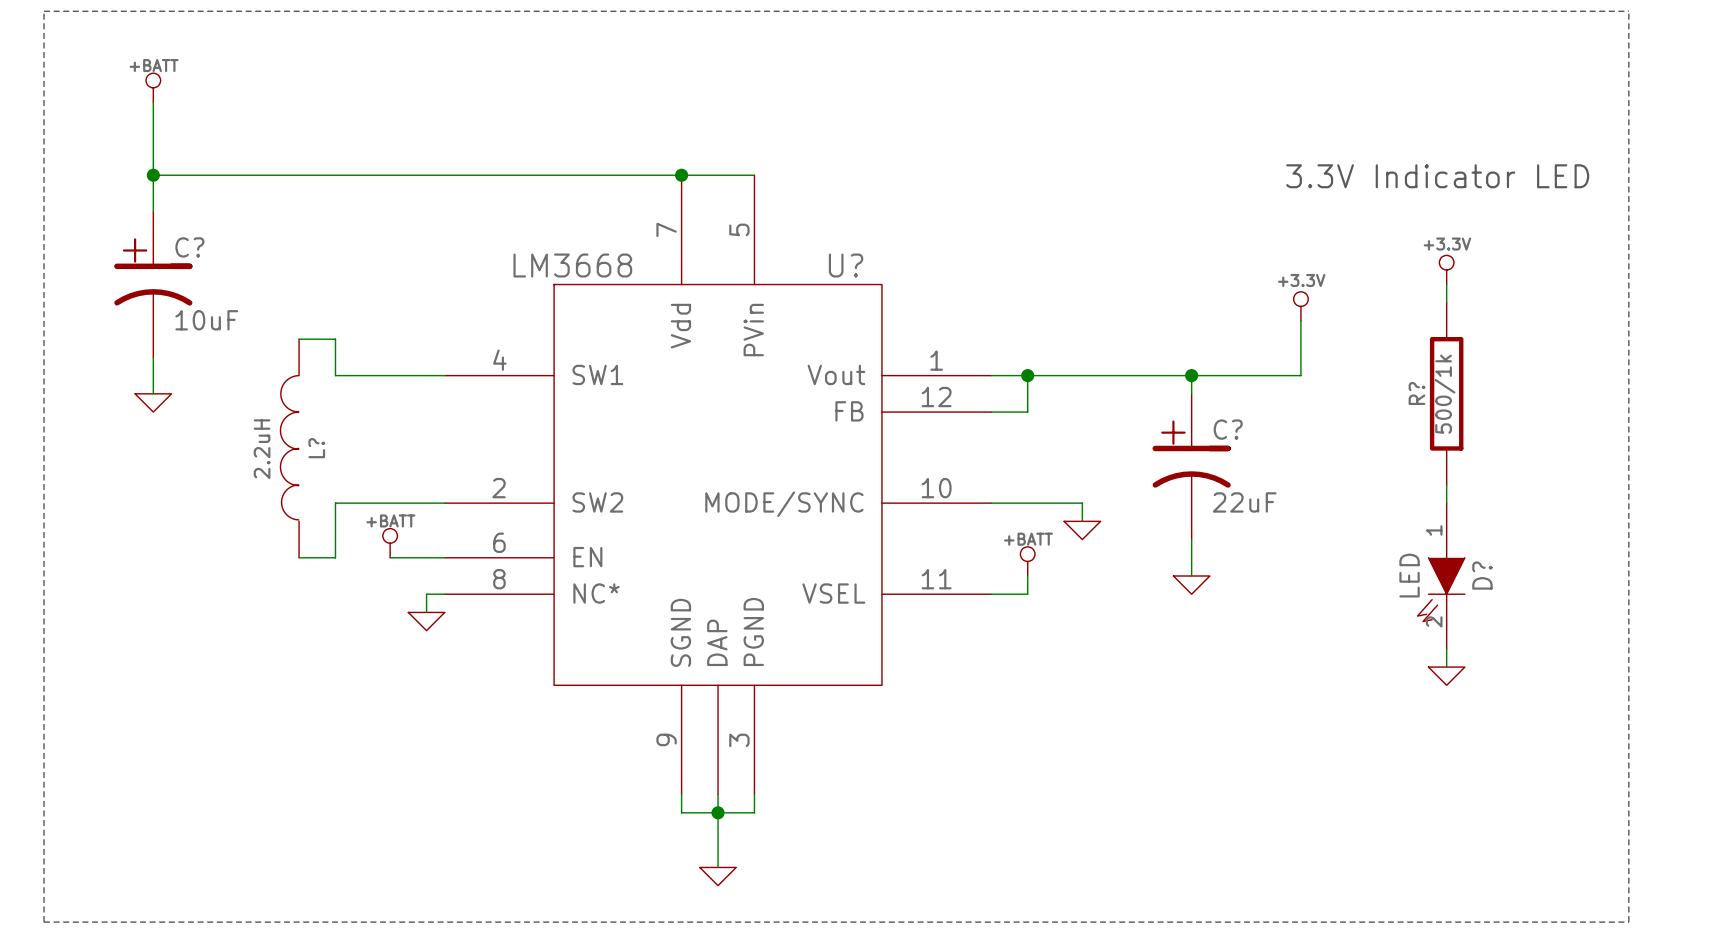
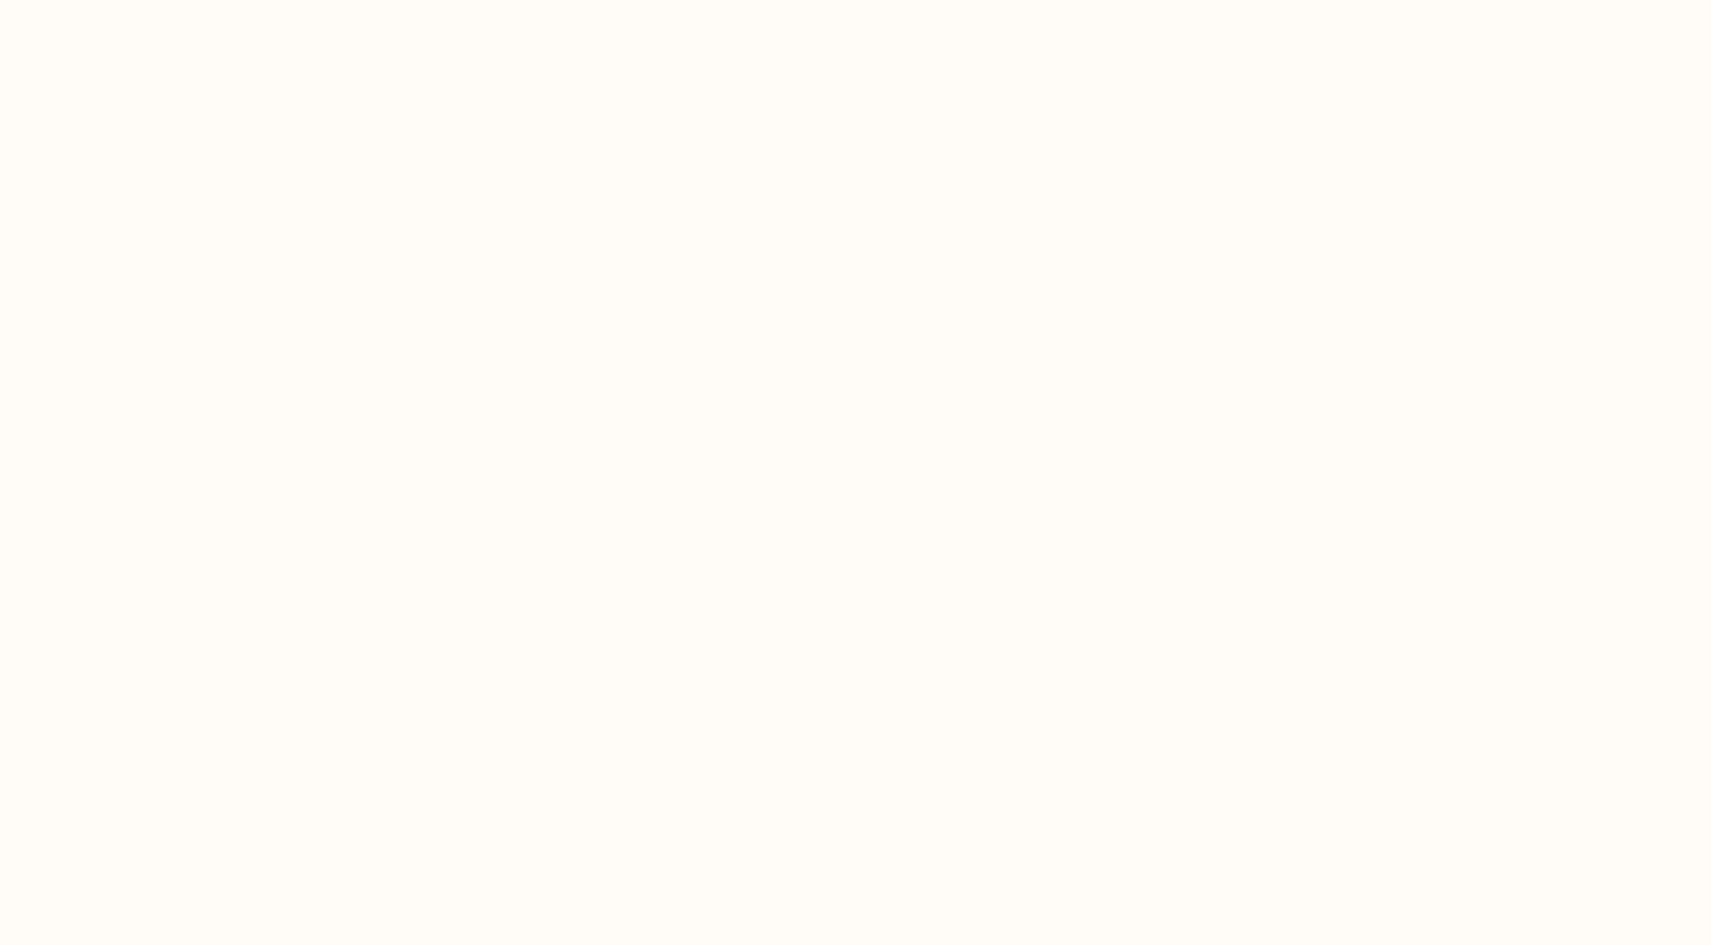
line: (44, 11) (1628, 11) (1628, 922) (44, 922) (44, 11) -> none
power symbol: +BATT (153, 87) -> none
wire: (153, 102) (153, 211) -> none
wire: (153, 175) (754, 175) -> none
junction: (153, 175) -> none
junction: (681, 175) -> none
text: 3.3V Indicator LED (1437, 176) -> none
power symbol: +3.3V (1446, 269) -> none
C?: 10uF (153, 284) -> none
wire: (1446, 284) (1446, 302) -> none
power symbol: +3.3V (1300, 306) -> none
wire: (1300, 320) (1300, 375) (991, 375) -> none
wire: (299, 339) (335, 339) (335, 375) (444, 375) -> none
wire: (153, 357) (153, 393) -> none
wire: (1027, 375) (1027, 412) (991, 412) -> none
junction: (1027, 375) -> none
wire: (1191, 375) (1191, 393) -> none
junction: (1191, 375) -> none
R?: 500/1k (1446, 393) -> none
power symbol: (153, 402) -> none
L?: 2.2uH (289, 448) -> none
C?: 22uF (1191, 466) -> none
U?: LM3668 (718, 484) -> none
wire: (1446, 484) (1446, 503) -> none
wire: (444, 503) (335, 503) (335, 557) (299, 557) -> none
wire: (991, 503) (1082, 503) (1082, 521) -> none
power symbol: (1082, 530) -> none
wire: (1191, 539) (1191, 576) -> none
power symbol: +BATT (390, 543) -> none
wire: (390, 557) (444, 557) -> none
power symbol: +BATT (1027, 561) -> none
wire: (1027, 576) (1027, 594) (991, 594) -> none
D?: LED (1441, 576) -> none
power symbol: (1191, 585) -> none
wire: (444, 594) (426, 594) (426, 612) -> none
power symbol: (426, 621) -> none
wire: (1446, 648) (1446, 667) -> none
power symbol: (1446, 676) -> none
wire: (681, 794) (681, 812) (754, 812) (754, 794) -> none
wire: (718, 794) (718, 867) -> none
junction: (718, 812) -> none
power symbol: (718, 876) -> none

